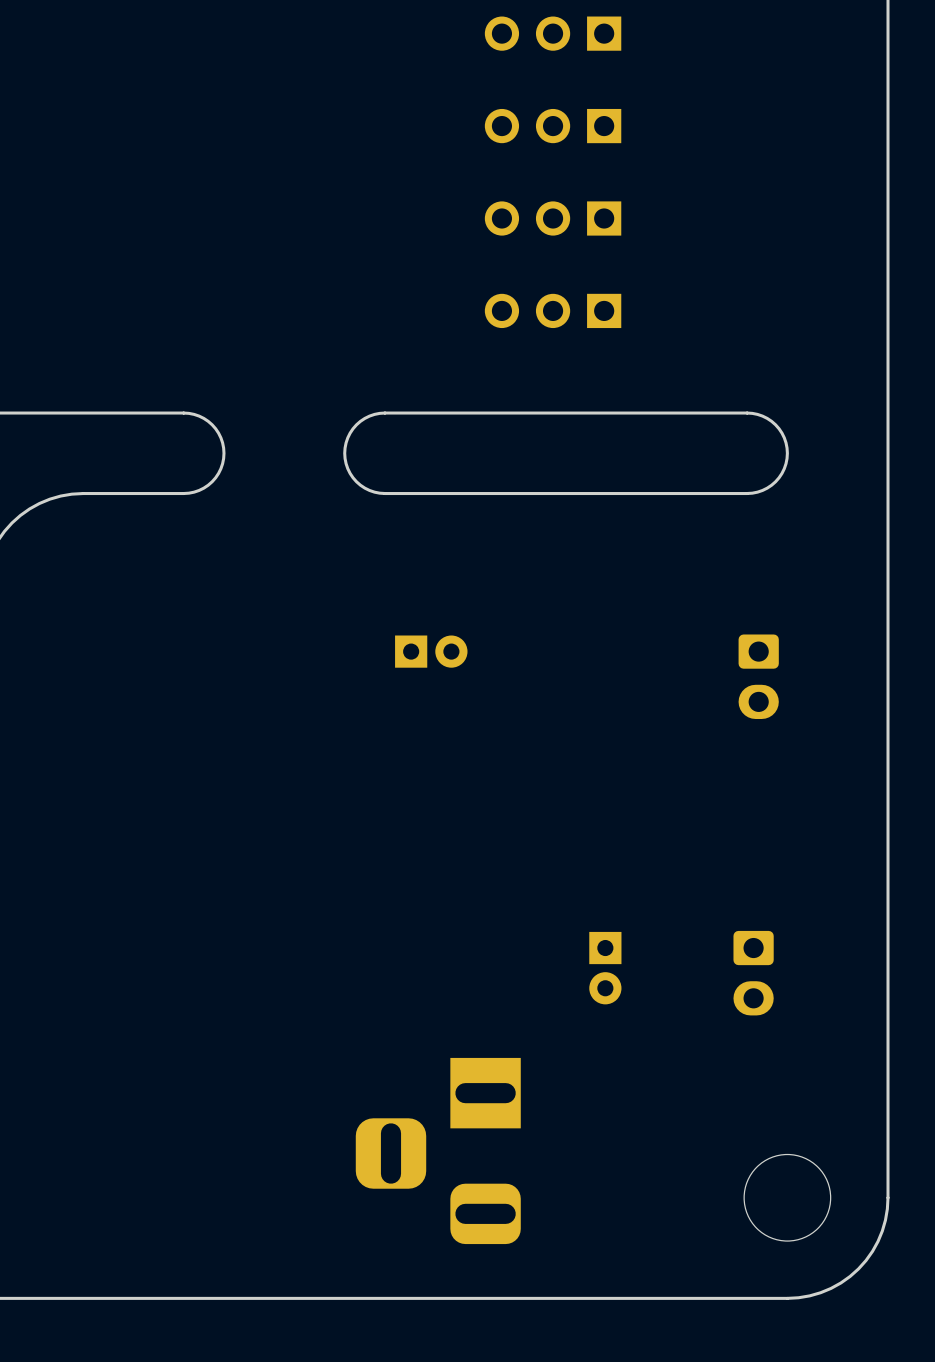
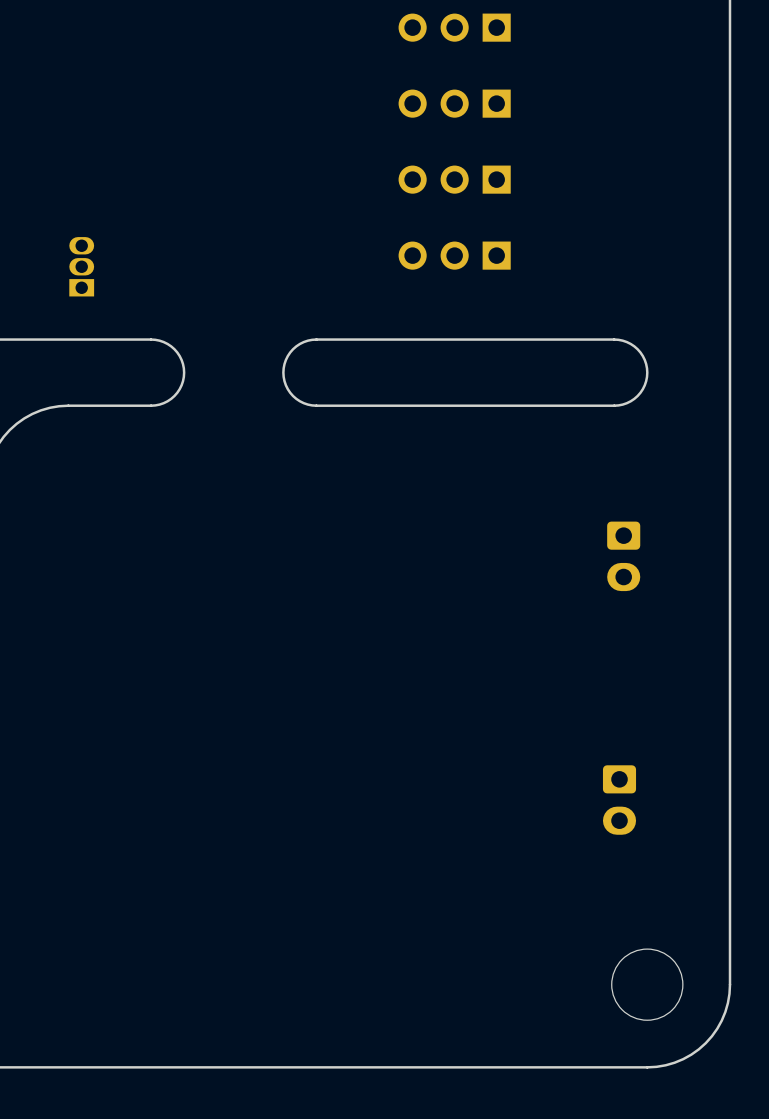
part: none -> (81, 266)
part: (431, 651) -> none
part: (605, 968) -> none
part: (438, 1150) -> none

